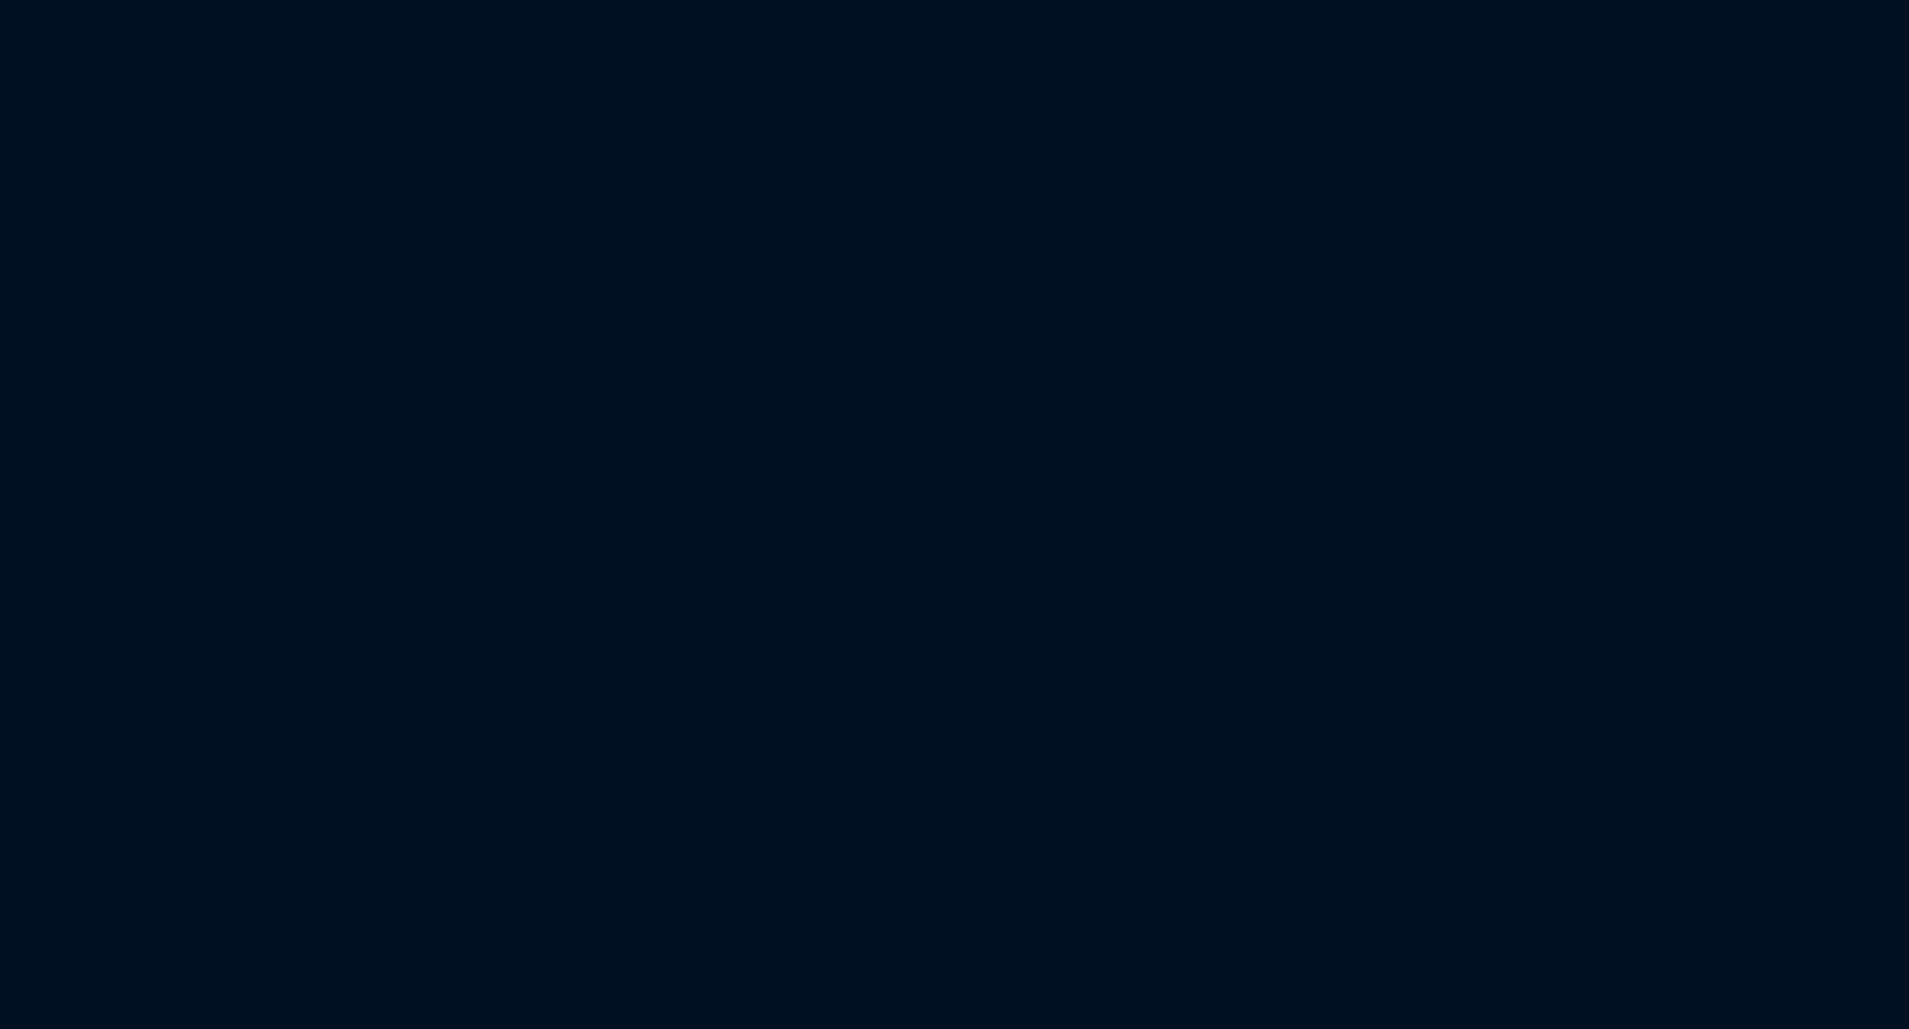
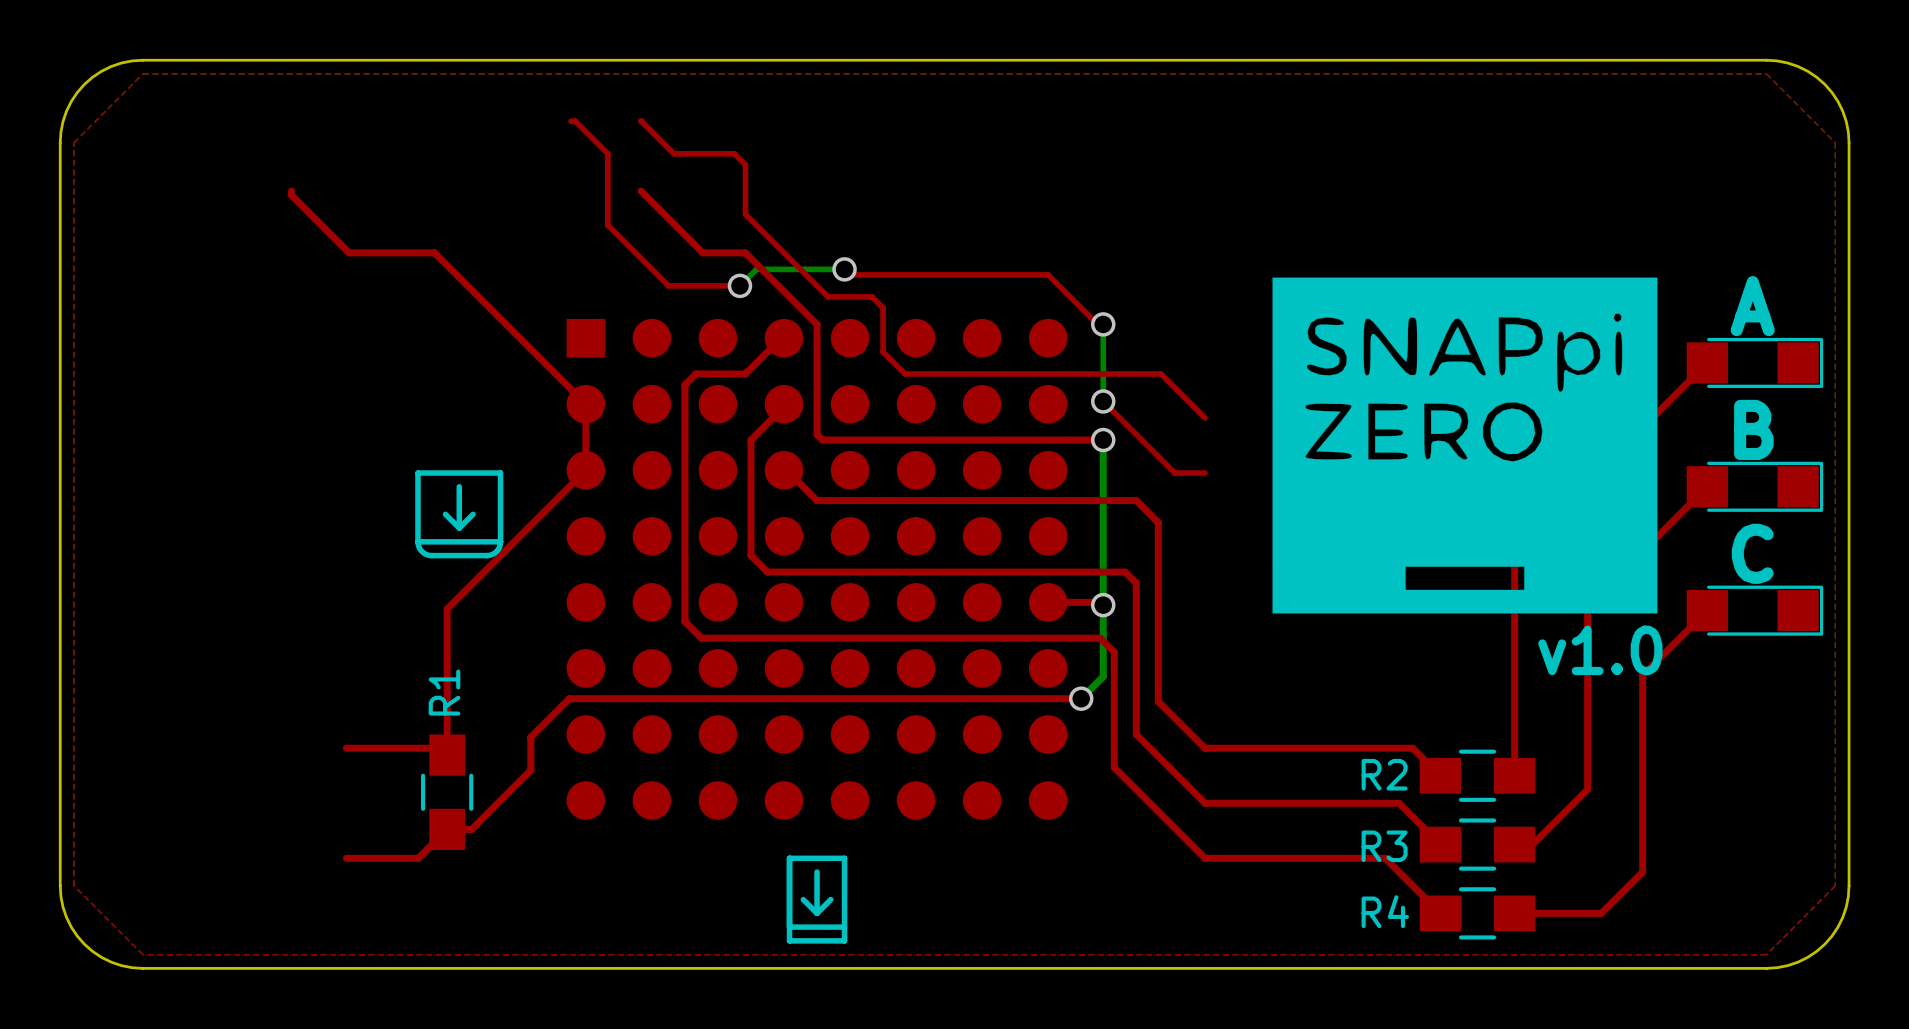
board edge: none -> (142, 60) (1766, 60) (1787, 63) (1807, 71) (1824, 84) (1837, 101) (1846, 121) (1849, 142) (1849, 885) (1846, 907) (1837, 927) (1824, 944) (1807, 957) (1787, 965) (1766, 968) (142, 968) (121, 965) (101, 957) (84, 944) (71, 927) (63, 907) (60, 885) (60, 142) (66, 111) (84, 84) (111, 66) (142, 60)
top zone outline: none -> (142, 73) (73, 142) (73, 885) (142, 954) (1766, 954) (1835, 885) (1835, 142) (1766, 73) (142, 73)
top track: none -> (571, 121) (575, 121) (607, 153) (607, 225) (668, 285) (739, 285)
top track: none -> (641, 121) (673, 153) (734, 153) (745, 164) (745, 214) (828, 296) (872, 296) (883, 307) (883, 351) (905, 373) (1161, 373) (1205, 417)
top track: none -> (291, 191) (291, 195) (349, 252) (434, 252) (585, 404) (585, 470) (447, 608) (447, 755) (440, 748) (346, 748)
top track: none -> (640, 191) (702, 252) (745, 252) (817, 324) (817, 434) (822, 440) (1103, 440)
top track: none -> (844, 269) (850, 274) (1048, 274) (1097, 324) (1103, 324)
bottom track: none -> (844, 269) (756, 269) (739, 285)
via: none -> (844, 269)
drawing: none -> [1272, 277, 1658, 614]
via: none -> (739, 285)
bottom track: none -> (1103, 324) (1103, 401)
via: none -> (1103, 324)
top track: none -> (784, 338) (781, 338) (745, 373) (695, 373) (684, 384) (684, 621) (701, 638) (1100, 638) (1114, 652) (1114, 767) (1205, 858) (1385, 858) (1440, 913)
top track: none -> (1707, 362) (1514, 555) (1514, 775)
part: none -> A (1754, 362)
top track: none -> (1103, 401) (1174, 473) (1205, 473)
via: none -> (1103, 401)
top track: none -> (784, 404) (784, 406) (750, 440) (750, 555) (767, 572) (1125, 572) (1136, 583) (1136, 734) (1205, 803) (1399, 803) (1440, 844)
bottom track: none -> (1103, 440) (1103, 676) (1081, 698)
via: none -> (1103, 440)
top track: none -> (784, 470) (786, 470) (817, 500) (1136, 500) (1158, 522) (1158, 701) (1205, 748) (1412, 748) (1440, 775)
line: none -> (459, 486) (459, 528)
top track: none -> (1707, 486) (1587, 606) (1587, 789) (1532, 844) (1514, 844)
part: none -> B (1754, 486)
line: none -> (445, 514) (459, 528)
line: none -> (473, 514) (459, 528)
line: none -> (417, 541) (500, 541)
line: none -> (417, 541) (417, 473) (500, 473) (500, 541)
line: none -> (417, 541) (422, 551) (431, 555) (490, 555) (497, 550) (500, 541)
part: none -> (817, 569)
top track: none -> (1048, 602) (1100, 602) (1103, 605)
via: none -> (1103, 605)
top track: none -> (1707, 610) (1642, 675) (1642, 872) (1601, 913) (1514, 913)
part: none -> C (1754, 610)
text: none -> v1.0 (1600, 650)
top track: none -> (1081, 698) (569, 698) (530, 737) (530, 770) (471, 829) (447, 829) (418, 858) (346, 858)
via: none -> (1081, 698)
R2: none -> (1477, 775)
R1: none -> (447, 792)
R3: none -> (1477, 844)
line: none -> (789, 858) (789, 940) (844, 940) (844, 858) (789, 858)
line: none -> (817, 872) (817, 913)
line: none -> (803, 899) (817, 913)
line: none -> (830, 899) (817, 913)
R4: none -> (1477, 913)
line: none -> (789, 927) (844, 927)

